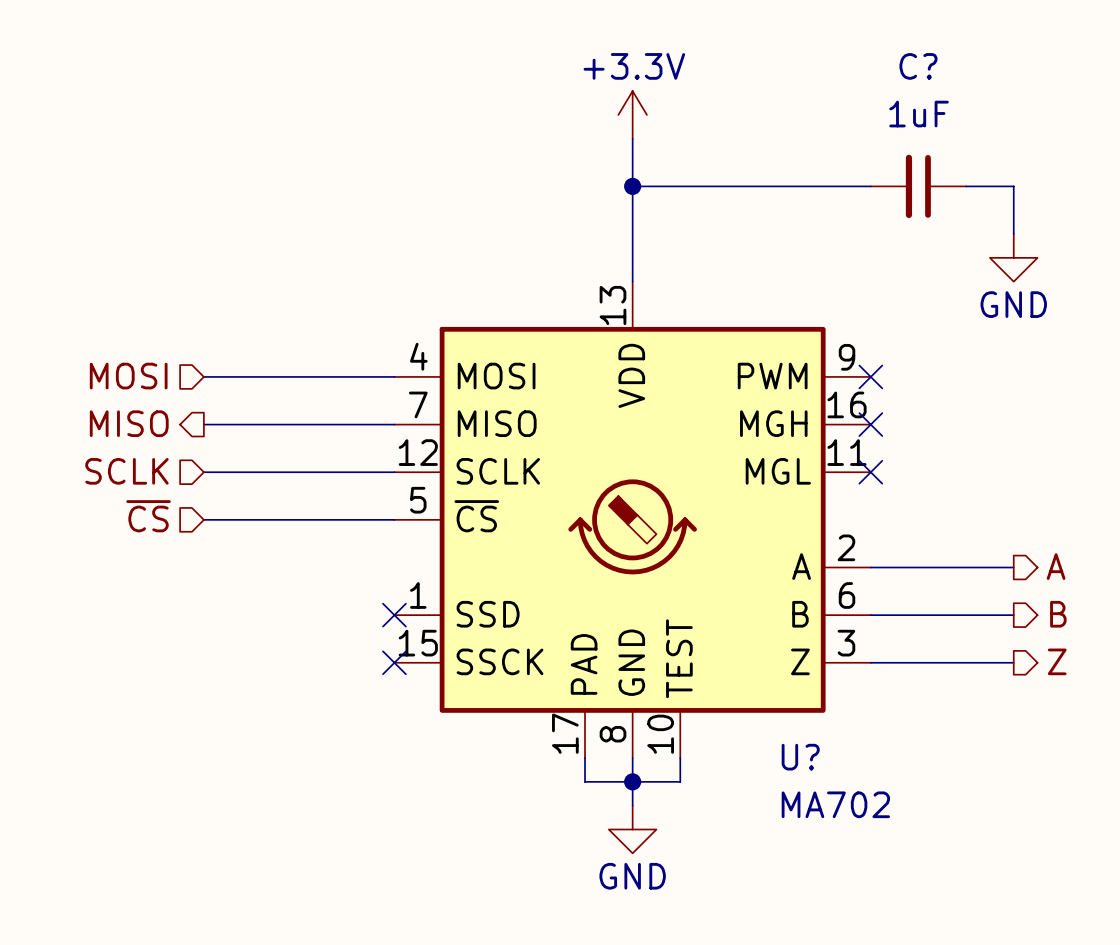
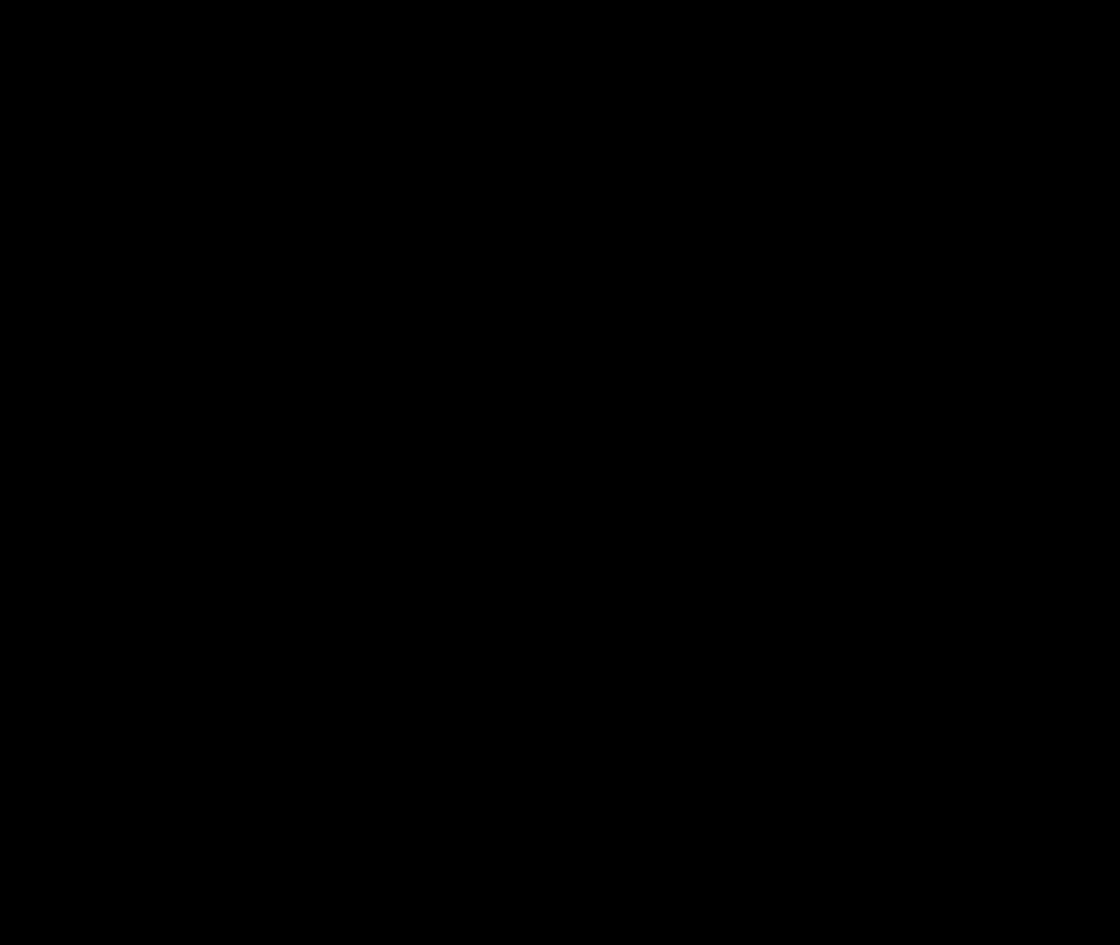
power symbol: +3.3V (632, 114) -> none
wire: (632, 138) (632, 281) -> none
wire: (632, 186) (870, 186) -> none
junction: (632, 186) -> none
C?: 1uF (918, 186) -> none
wire: (966, 186) (1013, 186) (1013, 234) -> none
power symbol: GND (1013, 257) -> none
hierarchical label: MOSI (128, 376) -> none
wire: (203, 376) (394, 376) -> none
no-connect mark: (870, 376) -> none
hierarchical label: MISO (129, 423) -> none
wire: (203, 424) (394, 424) -> none
no-connect mark: (870, 424) -> none
hierarchical label: SCLK (126, 471) -> none
wire: (203, 472) (394, 472) -> none
no-connect mark: (870, 472) -> none
hierarchical label: ~{CS} (148, 516) -> none
wire: (203, 519) (394, 519) -> none
U?: MA702 (632, 519) -> none
hierarchical label: A (1056, 566) -> none
wire: (870, 567) (1013, 567) -> none
hierarchical label: B (1058, 614) -> none
no-connect mark: (394, 615) -> none
wire: (870, 615) (1013, 615) -> none
hierarchical label: Z (1057, 661) -> none
no-connect mark: (394, 662) -> none
wire: (870, 662) (1013, 662) -> none
wire: (585, 758) (585, 781) (680, 781) (680, 758) -> none
wire: (632, 758) (632, 805) -> none
junction: (632, 781) -> none
power symbol: GND (632, 829) -> none

